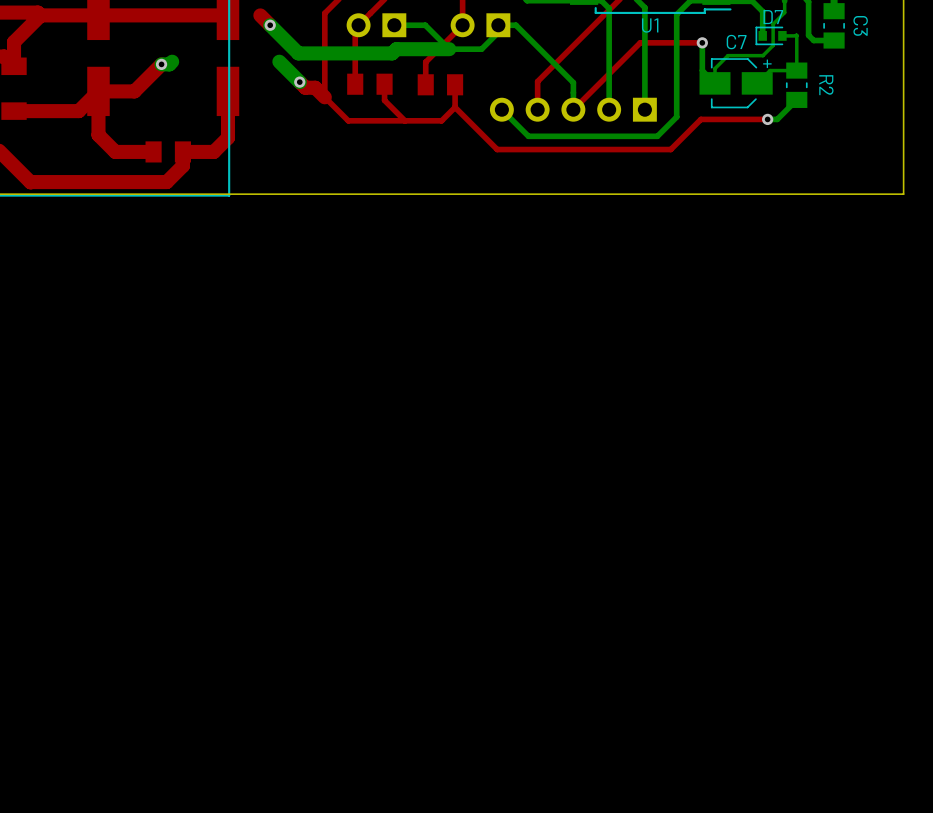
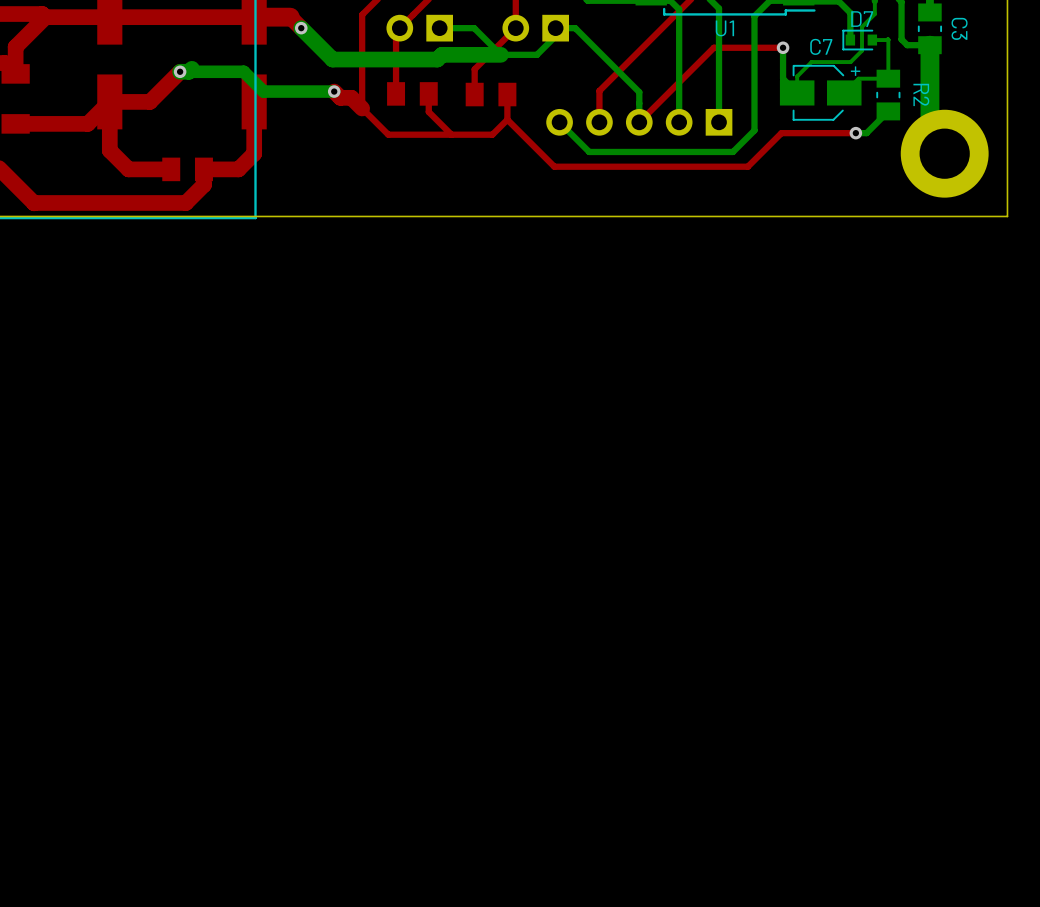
top track: none -> (290, 17) (254, 17)
bottom track: none -> (929, 45) (929, 138) (944, 153)
bottom track: (279, 61) (299, 82) -> (188, 71) (243, 71) (263, 91) (334, 91)
part: none -> (944, 153)

